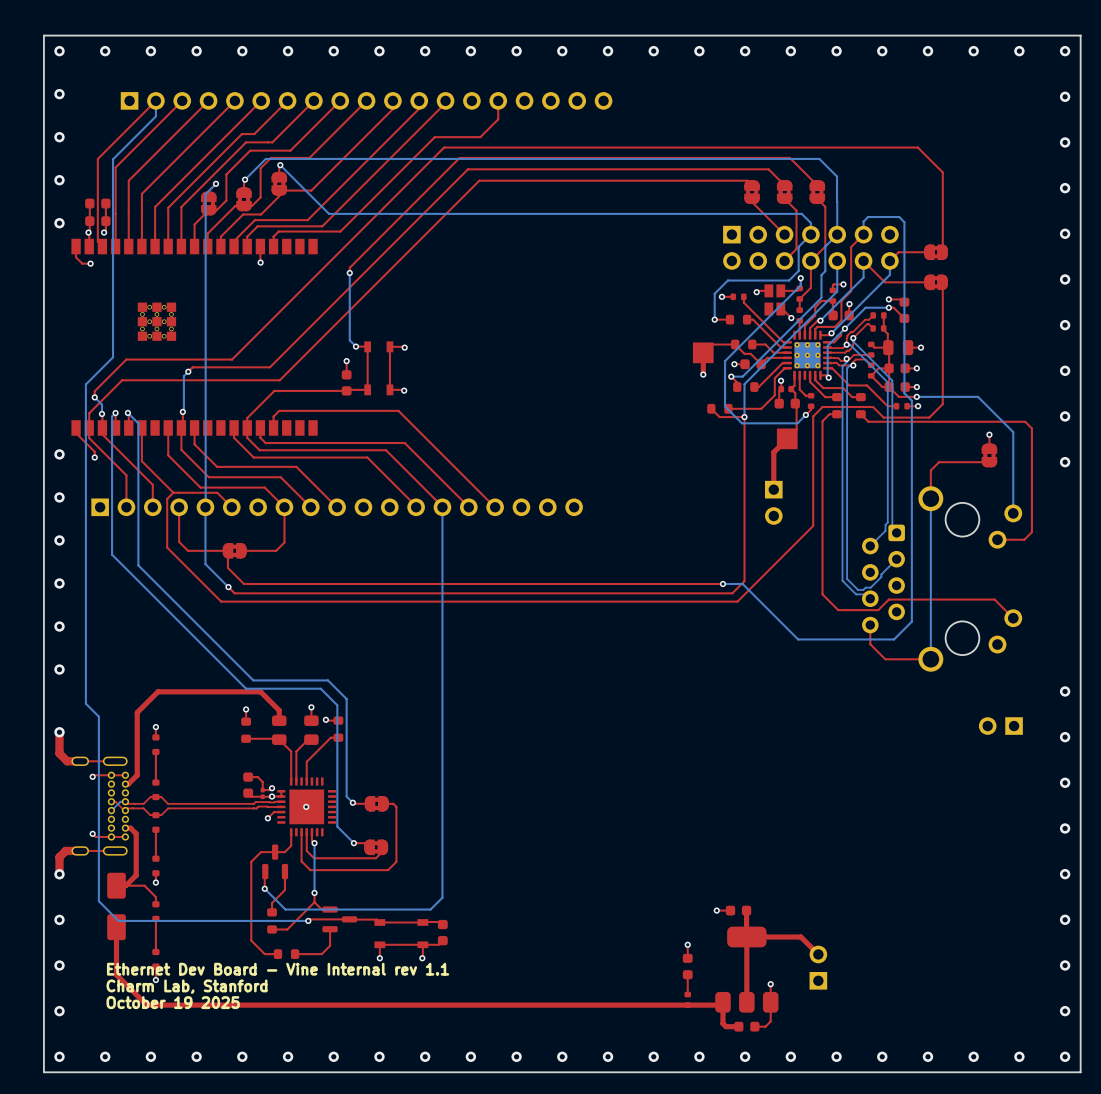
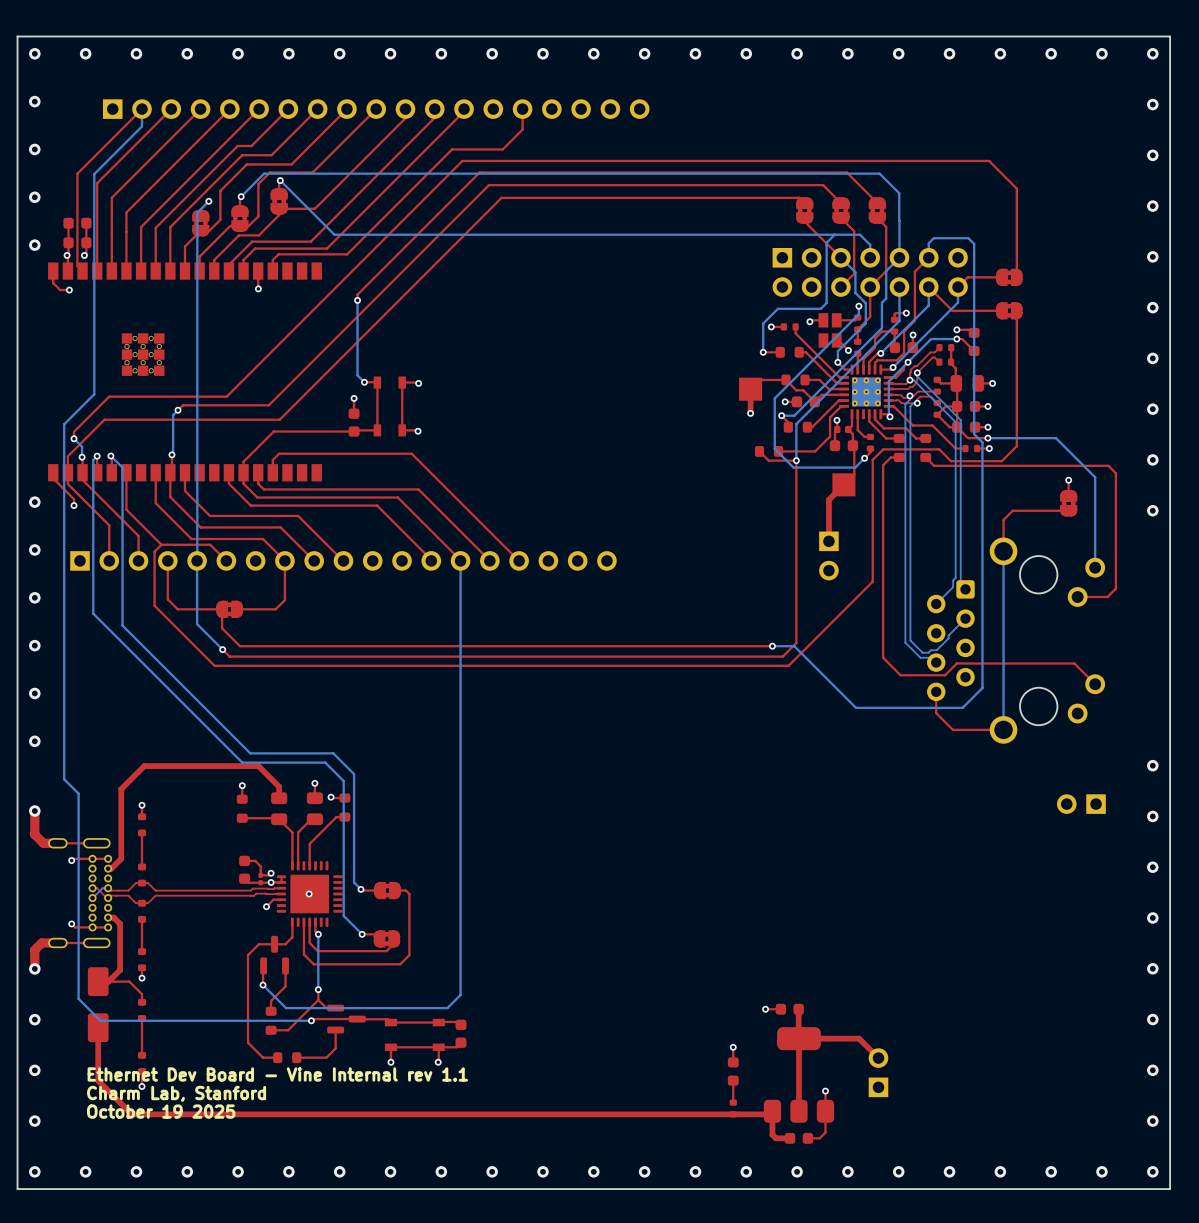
bottom track: none -> (840, 257) (855, 272) (855, 292) (865, 303) (865, 323) (837, 351) (837, 362)
bottom track: (810, 234) (798, 246) (798, 270) (789, 280) (766, 280) -> (834, 234) (826, 242) (826, 303) (820, 308)
top track: none -> (837, 362) (845, 369) (851, 369)
via: none -> (837, 362)

